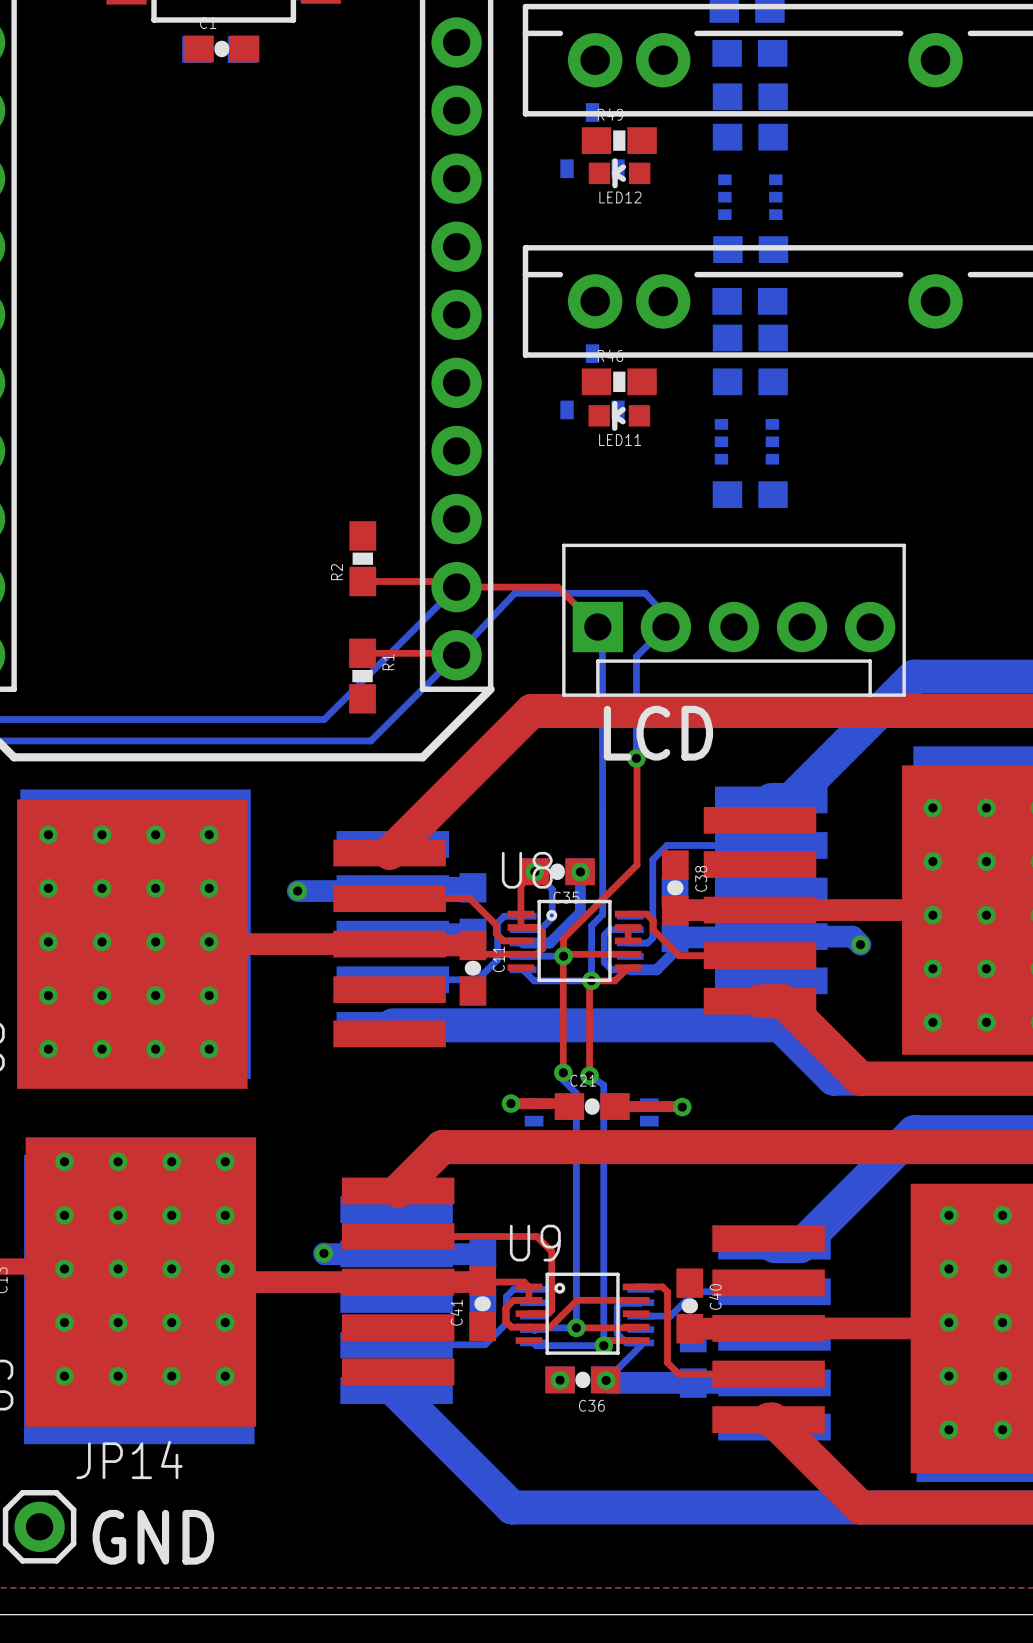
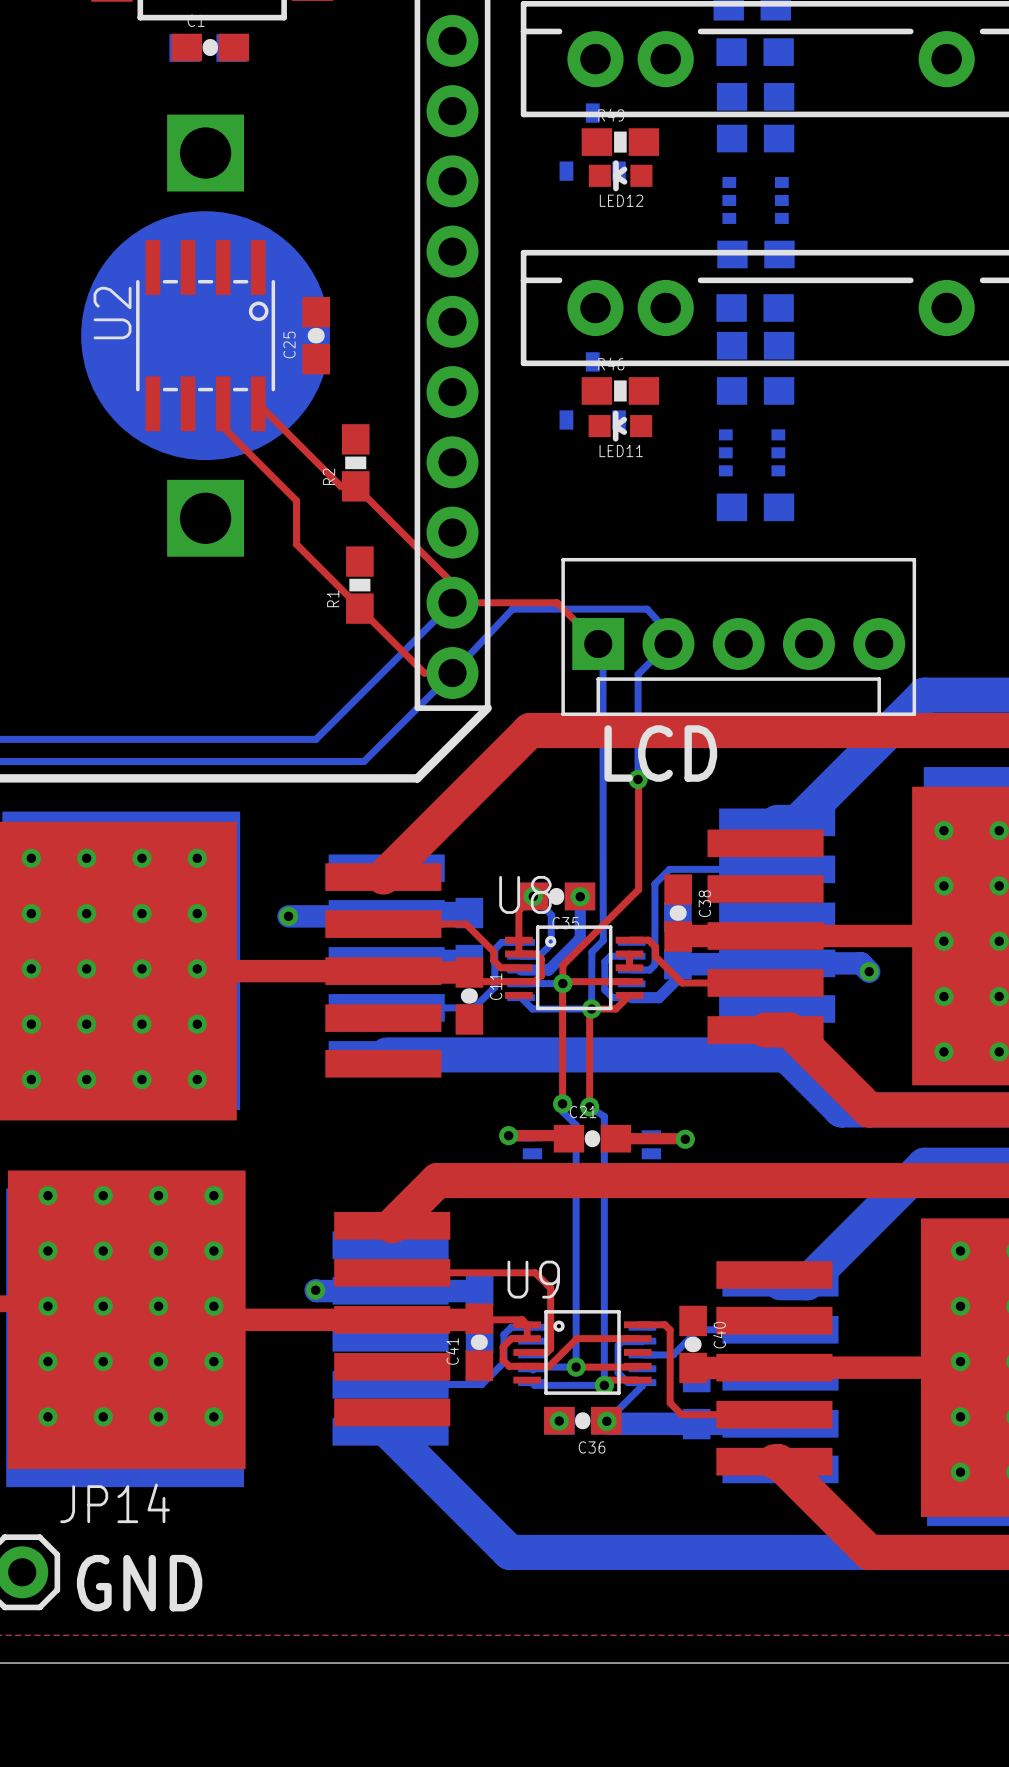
U2: none -> (205, 335)
part: none -> (205, 335)
C25: none -> (316, 335)
R2 position: (362, 558) -> (355, 462)
top track: (362, 581) (450, 581) (456, 587) -> (258, 403) (340, 486) (355, 486) (452, 583) (452, 602)
top track: (362, 653) (454, 653) (456, 655) -> (223, 403) (223, 427) (296, 500) (296, 544) (424, 673) (452, 673)
R1 name position: R1 (388, 662) -> R1 (333, 598)
R1 position: (362, 676) -> (359, 585)

